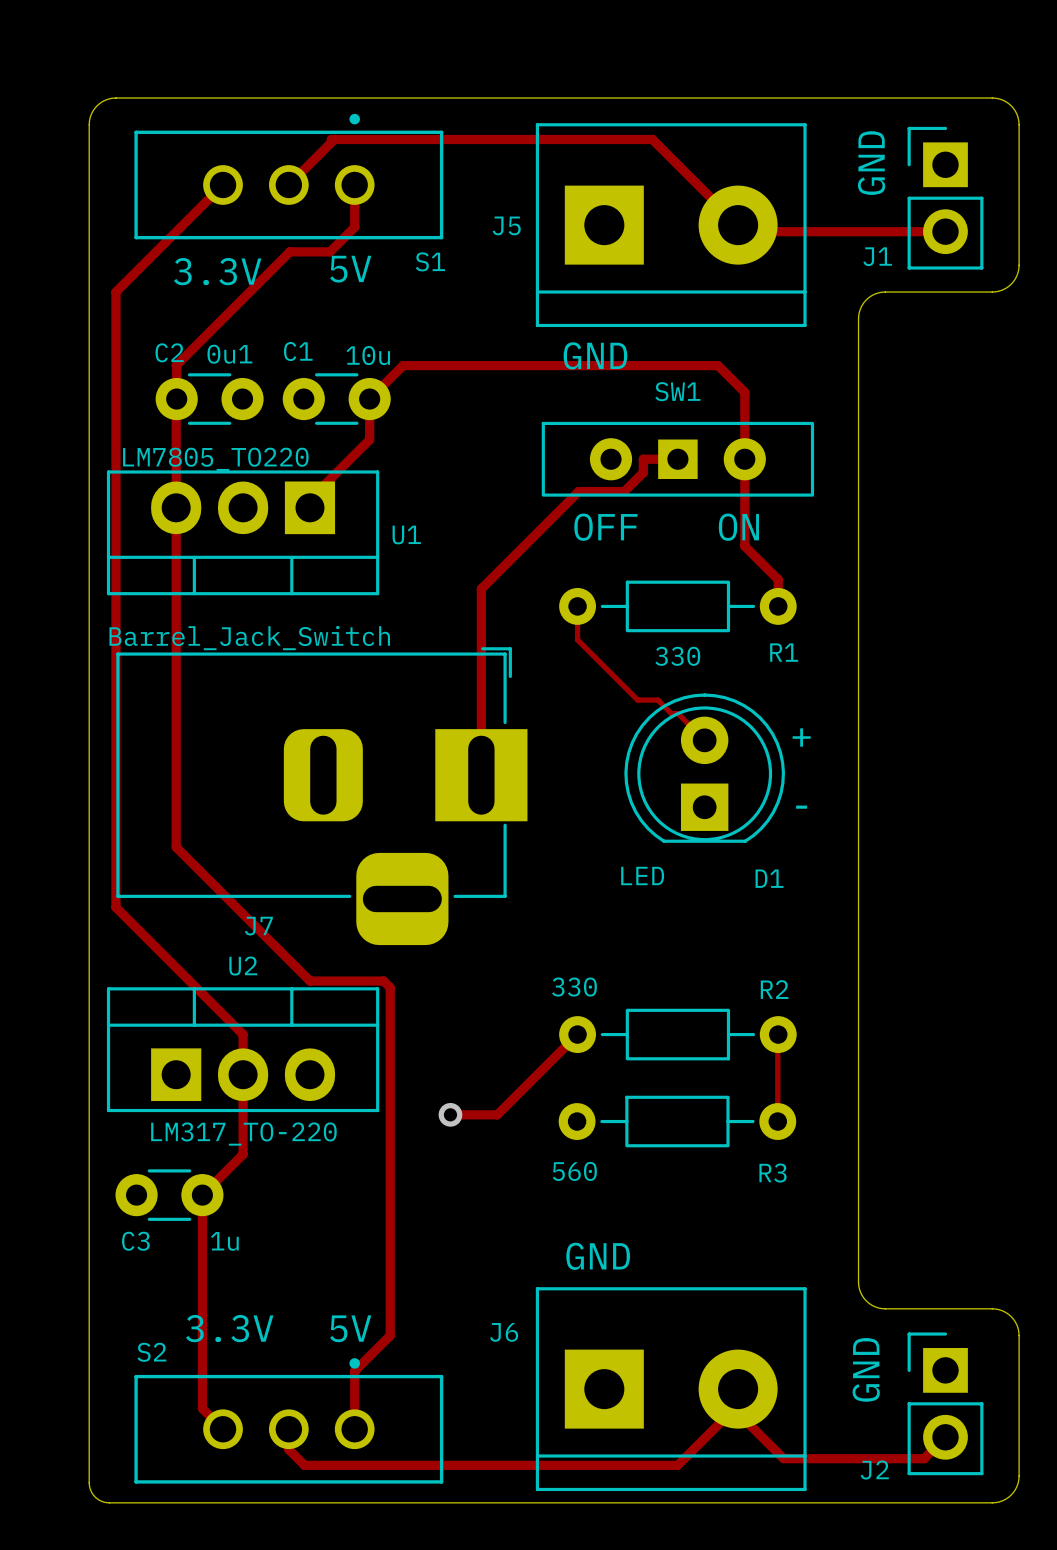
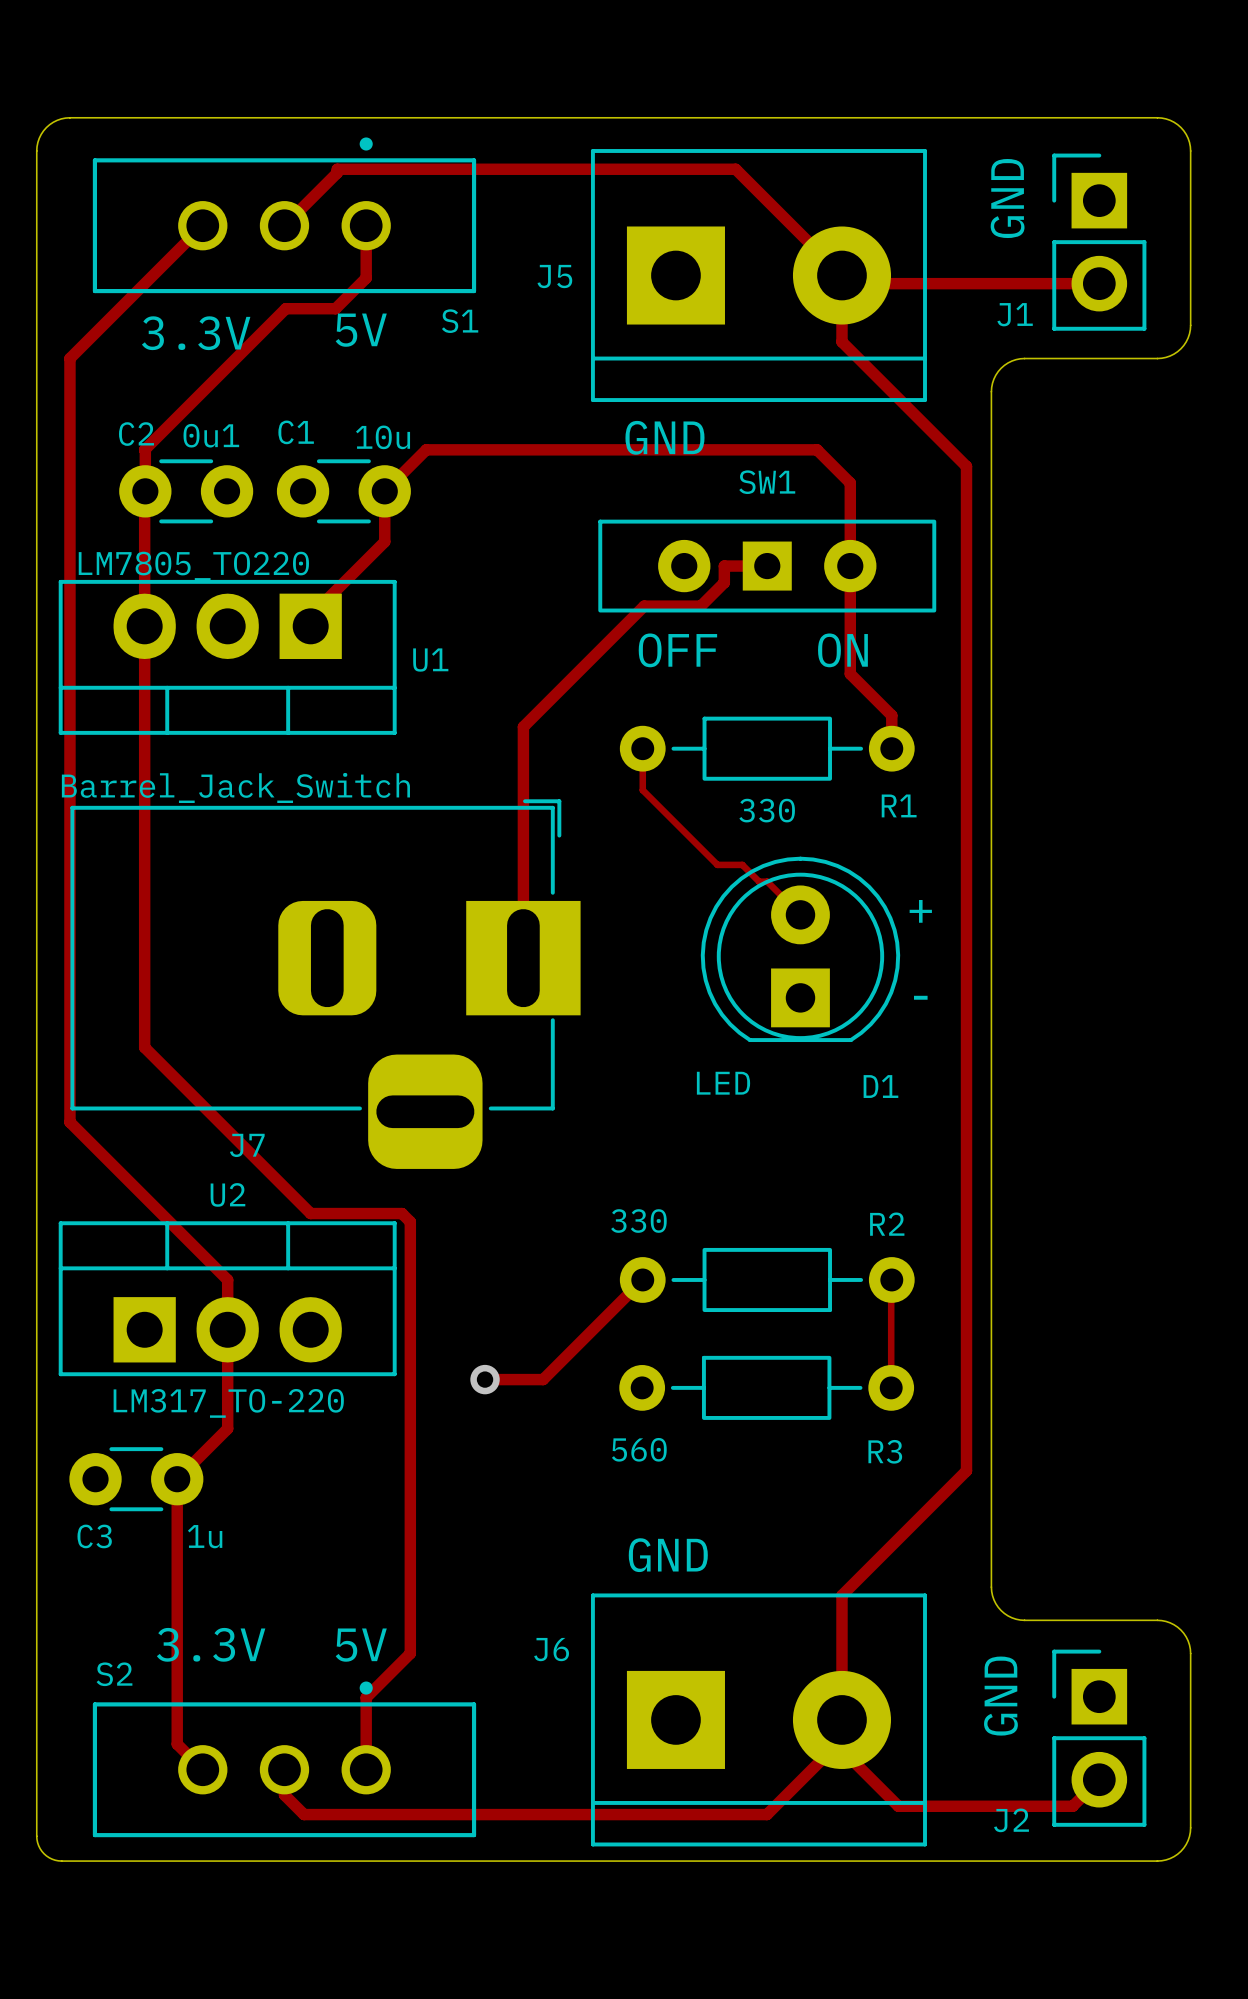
track: none -> (841, 275) (841, 341) (966, 466) (966, 1470) (841, 1595) (841, 1719)

